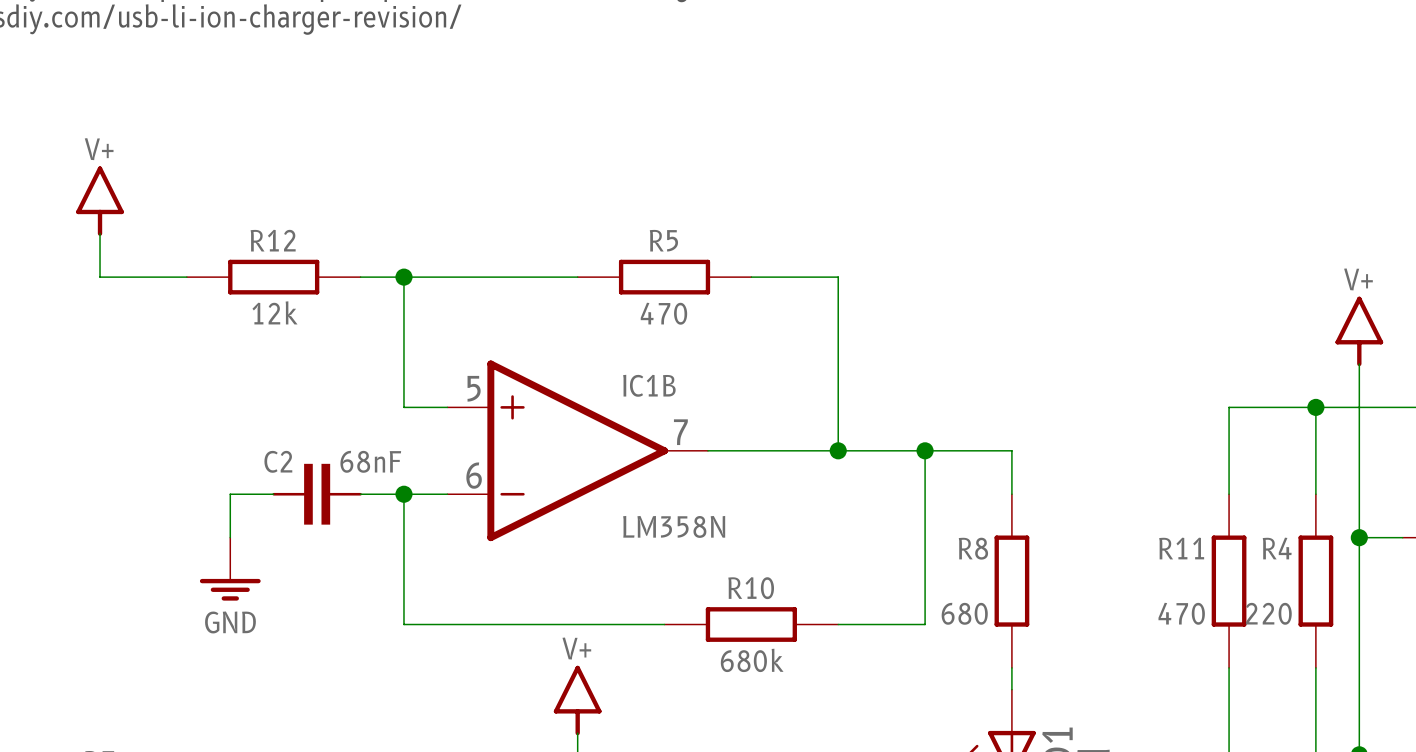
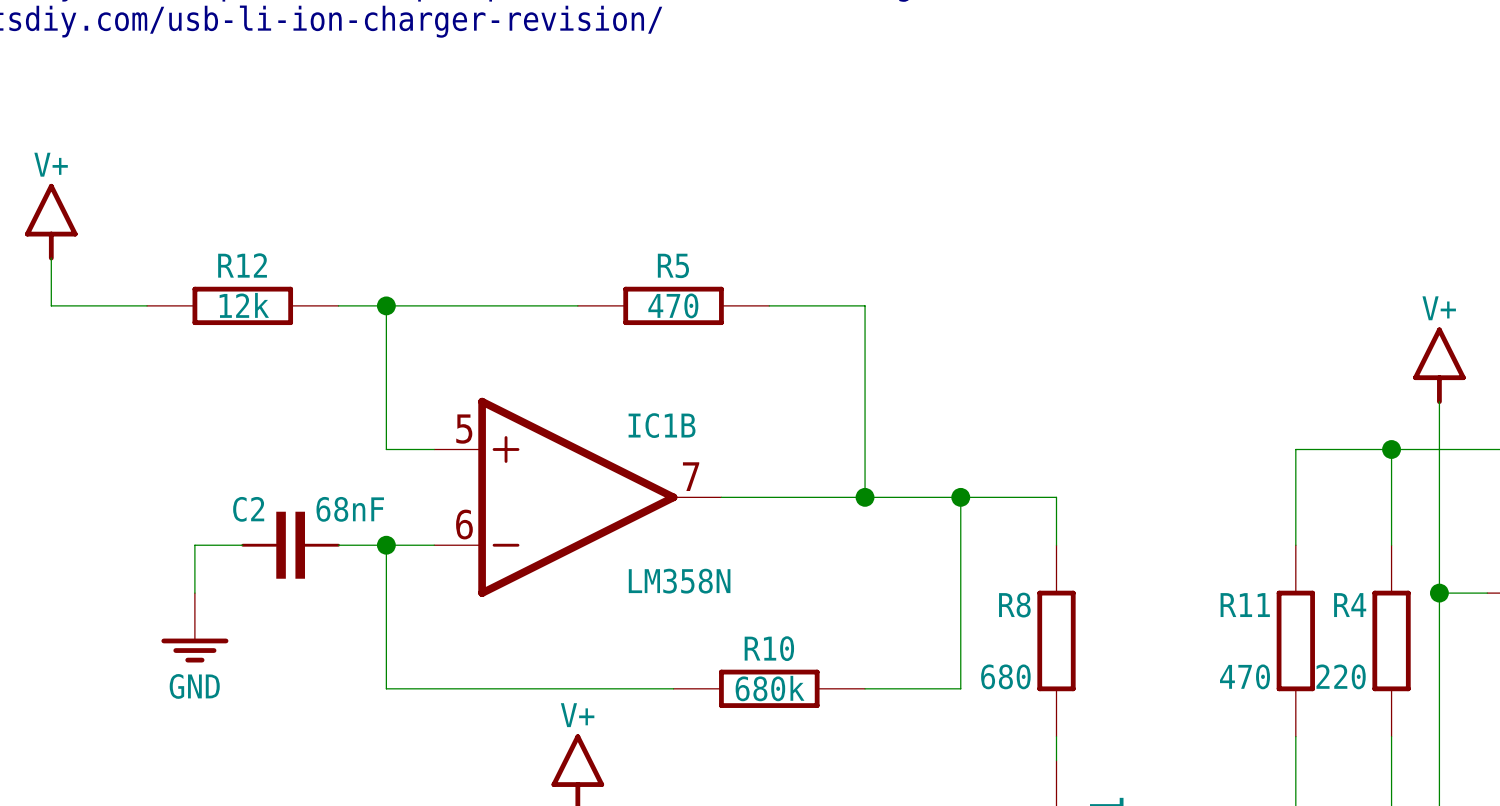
R12 value position: 12k (274, 312) -> 12k (244, 305)
R5 value position: 470 (663, 313) -> 470 (673, 305)
R10 value position: 680k (752, 660) -> 680k (770, 688)

